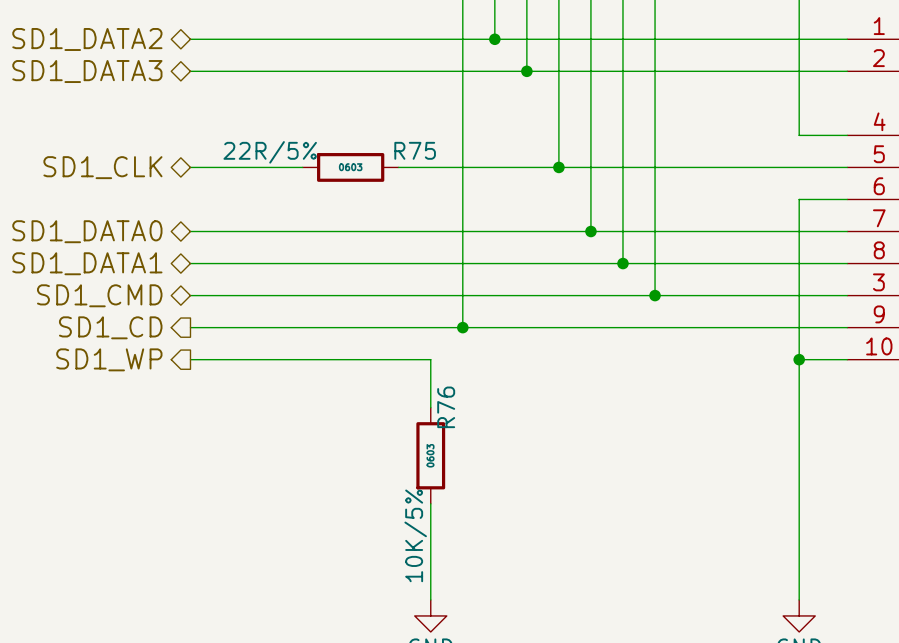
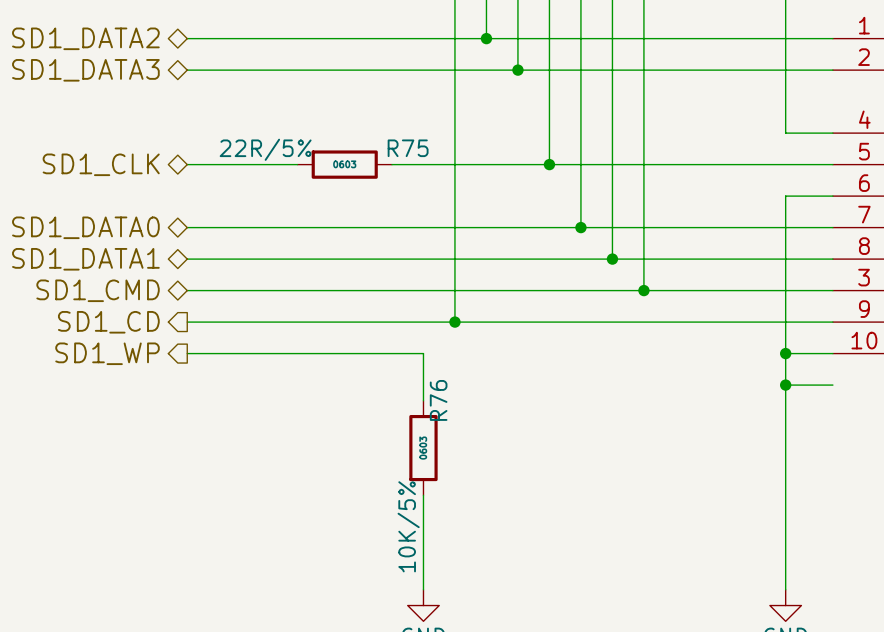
wire: none -> (785, 385) (832, 385)
junction: none -> (785, 385)

